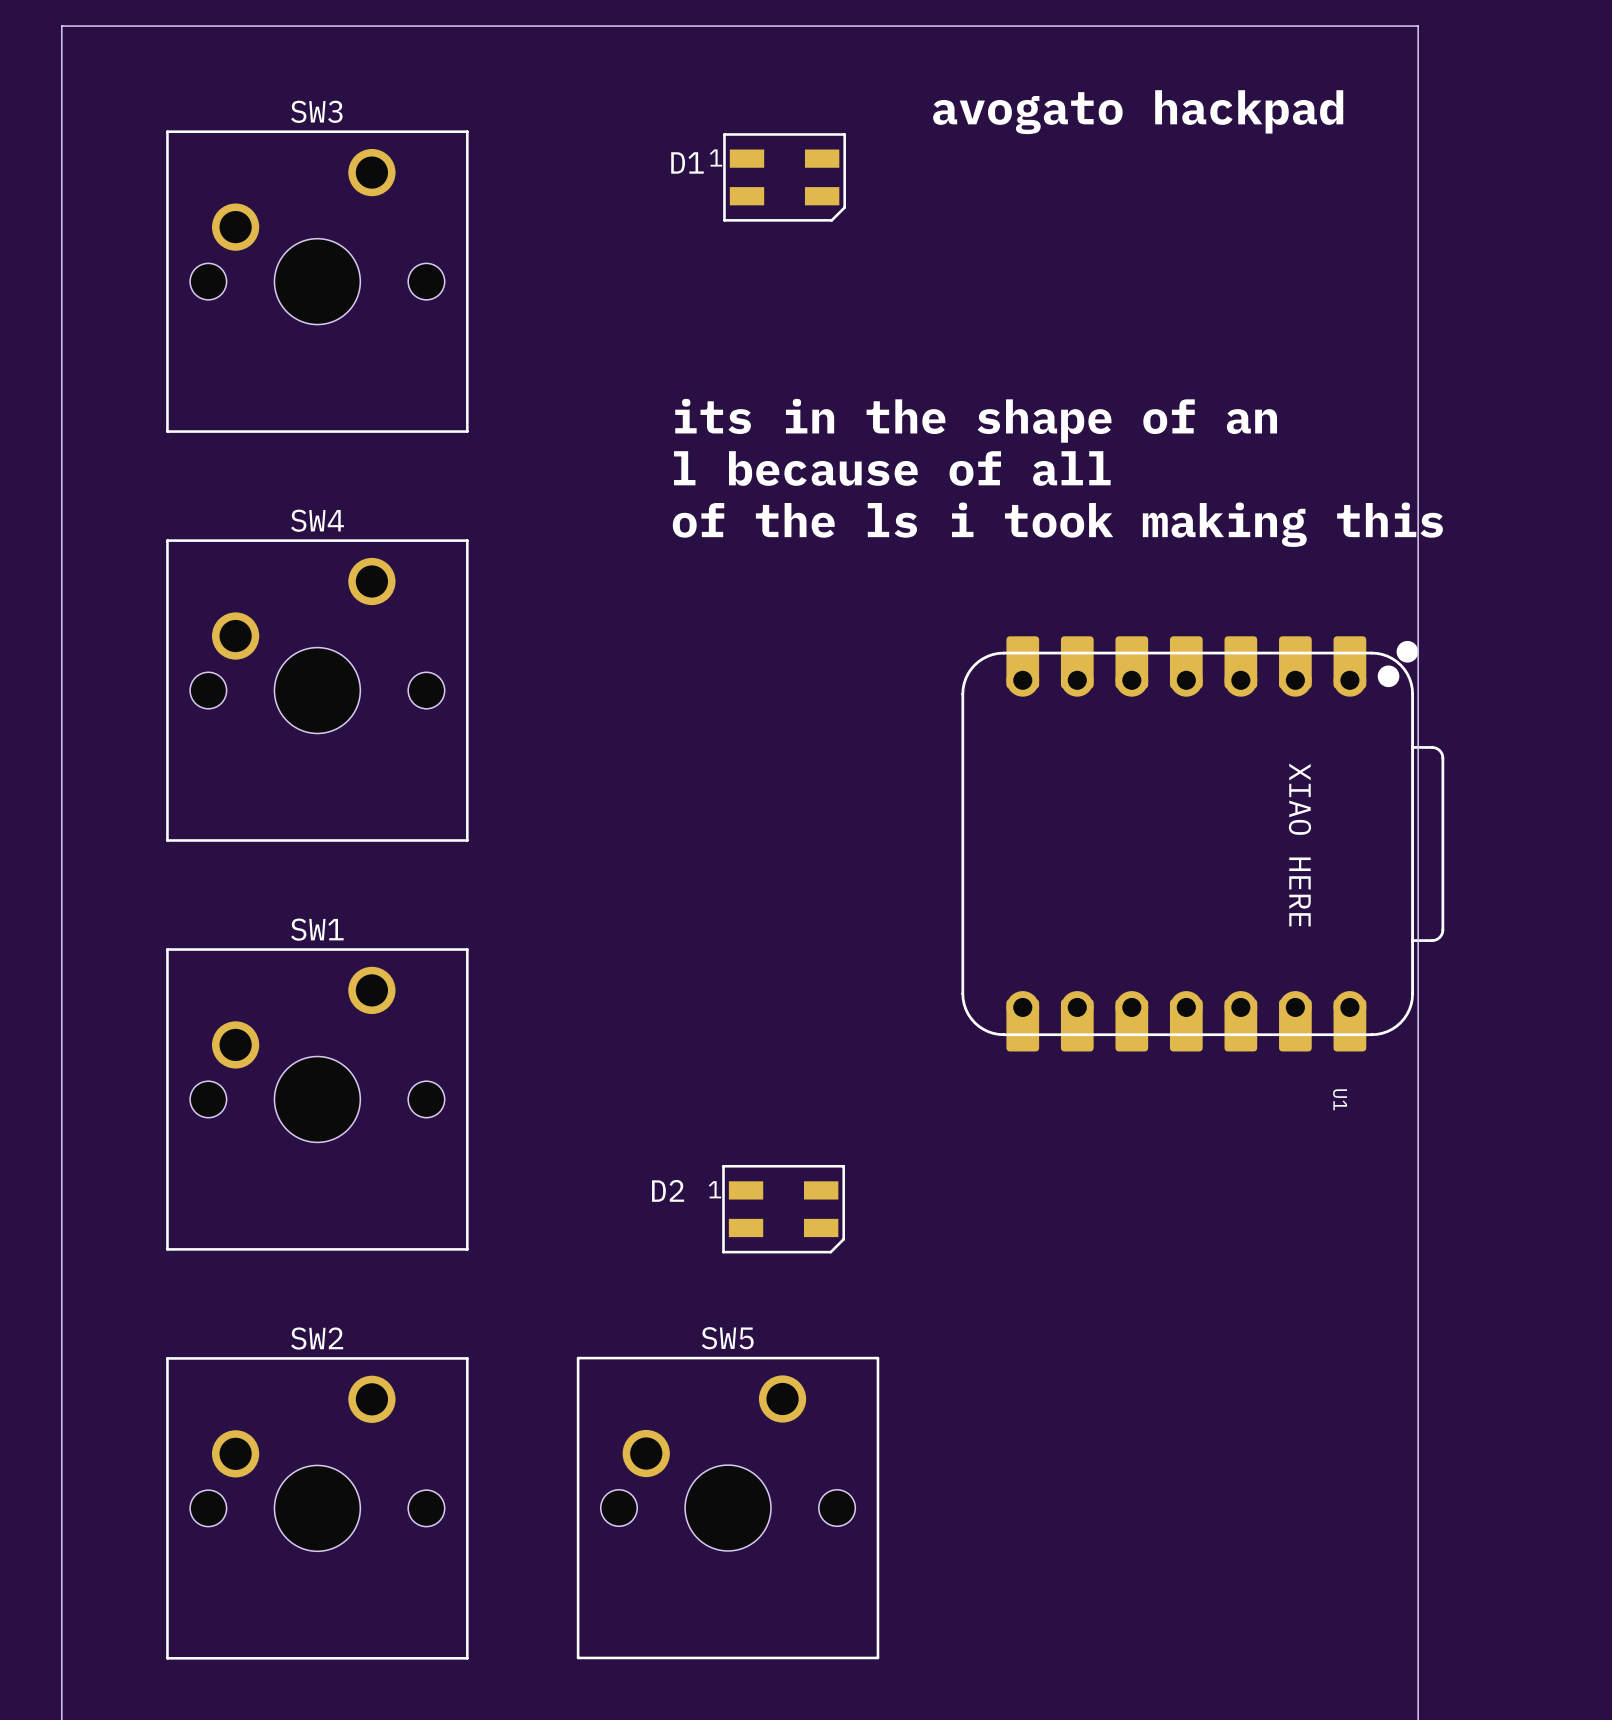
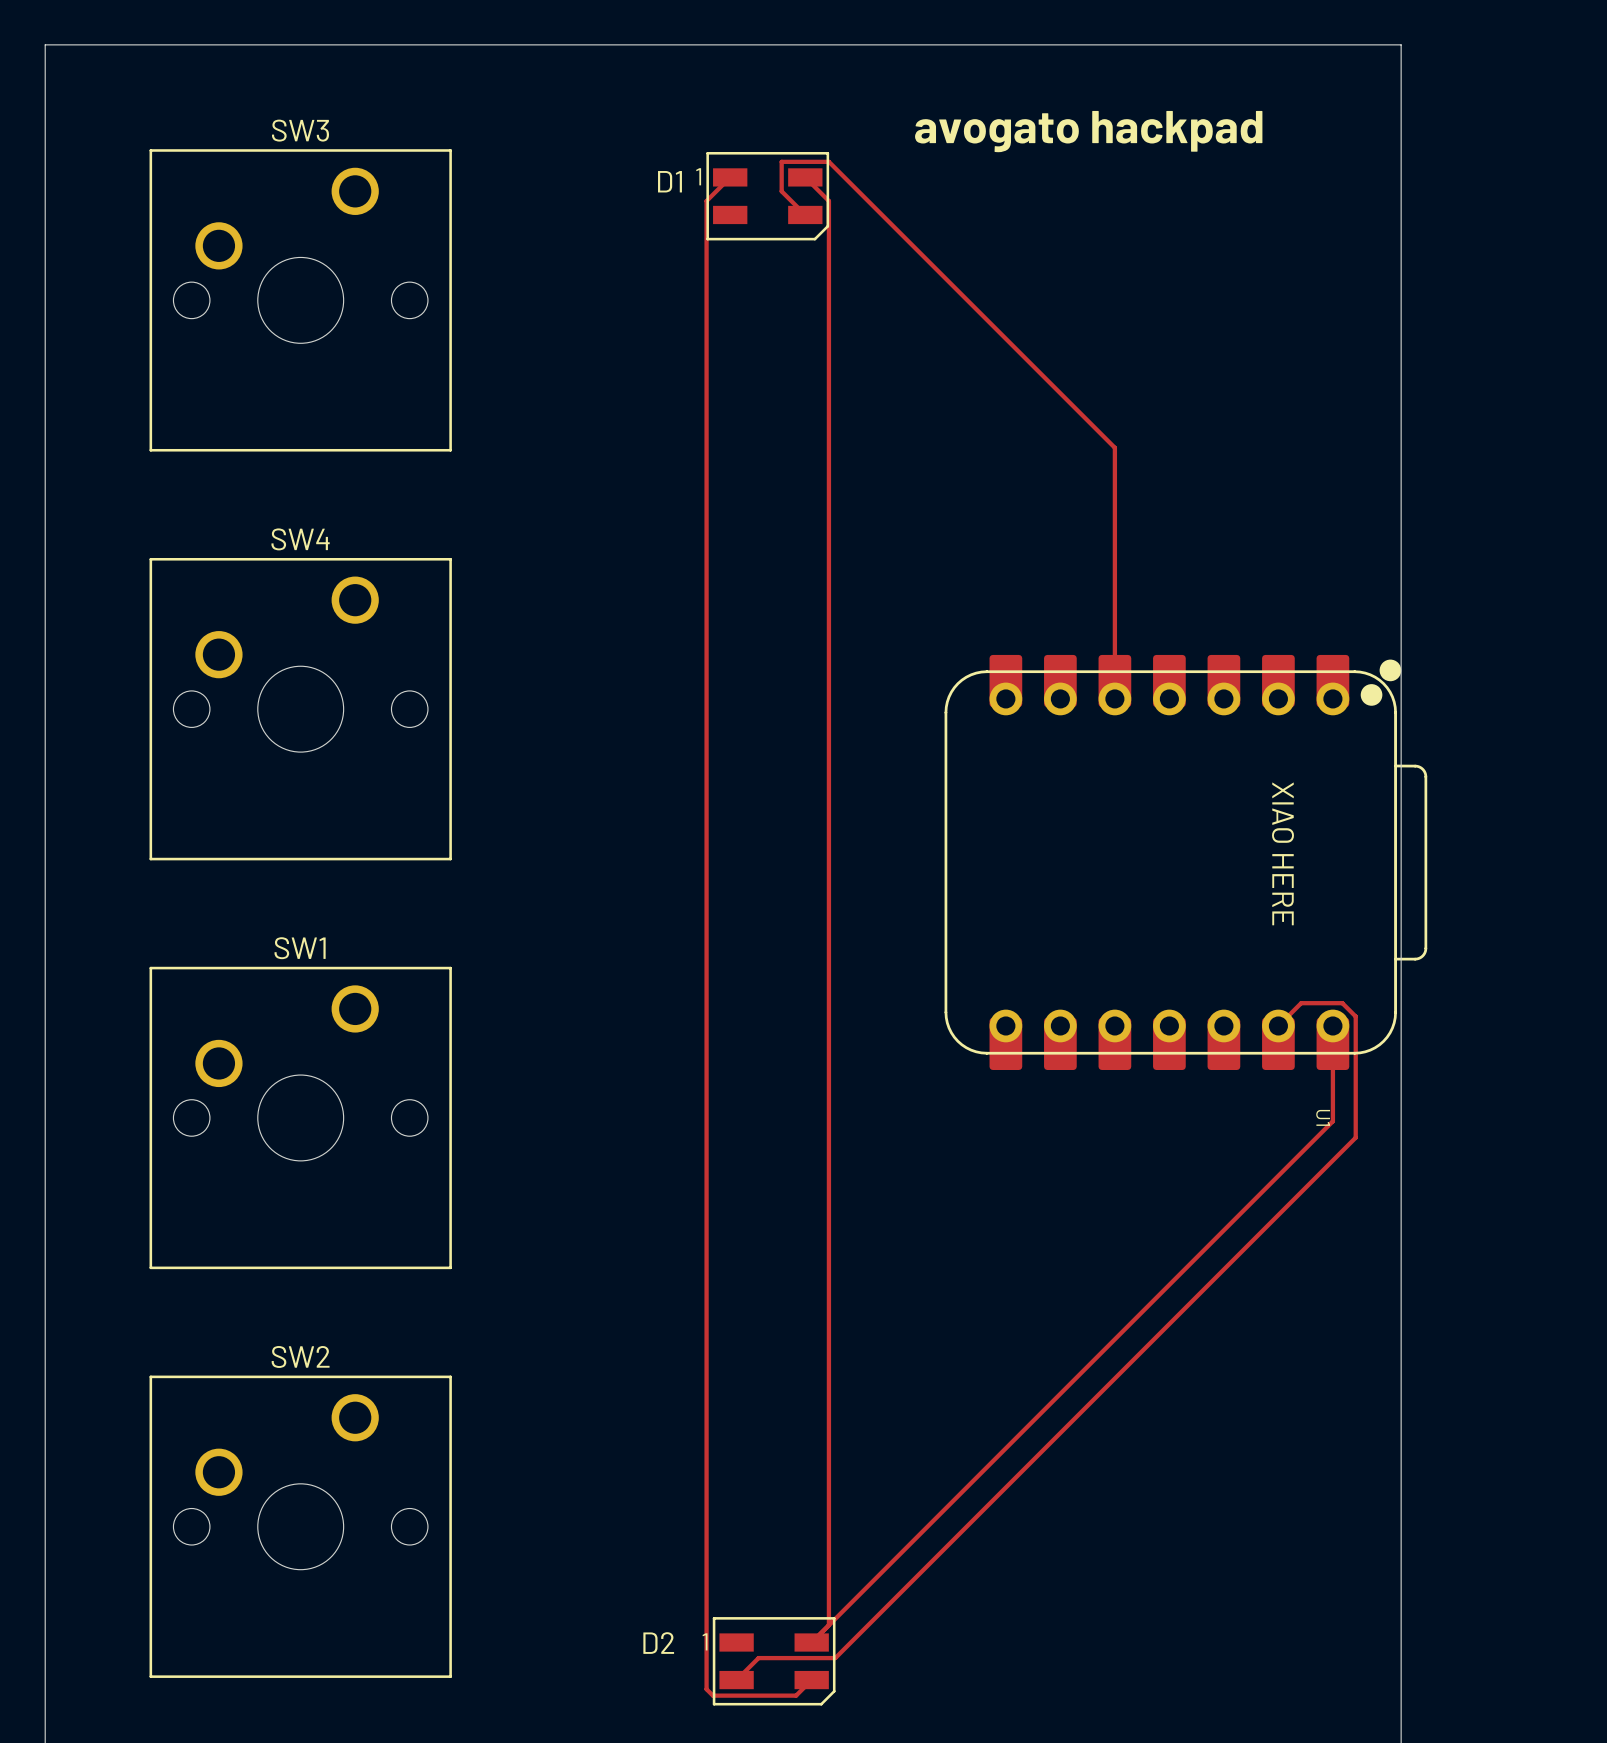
track: none -> (730, 177) (706, 201) (706, 1689) (712, 1695) (796, 1695) (811, 1680)
track: none -> (805, 177) (828, 201) (828, 1625)
track: none -> (805, 214) (781, 191) (781, 161) (828, 161) (1114, 447) (1114, 698)
text: its in the shape of an (976, 420) -> none
text: l because of all (892, 468) -> none
text: of the ls i took making this (1057, 524) -> none
track: none -> (1278, 1025) (1301, 1003) (1342, 1003) (1355, 1016) (1355, 1137) (835, 1658) (758, 1658) (736, 1680)
track: none -> (1332, 1025) (1332, 1121) (811, 1642)
D2 position: (783, 1209) -> (774, 1661)
SW5: (728, 1508) -> none

